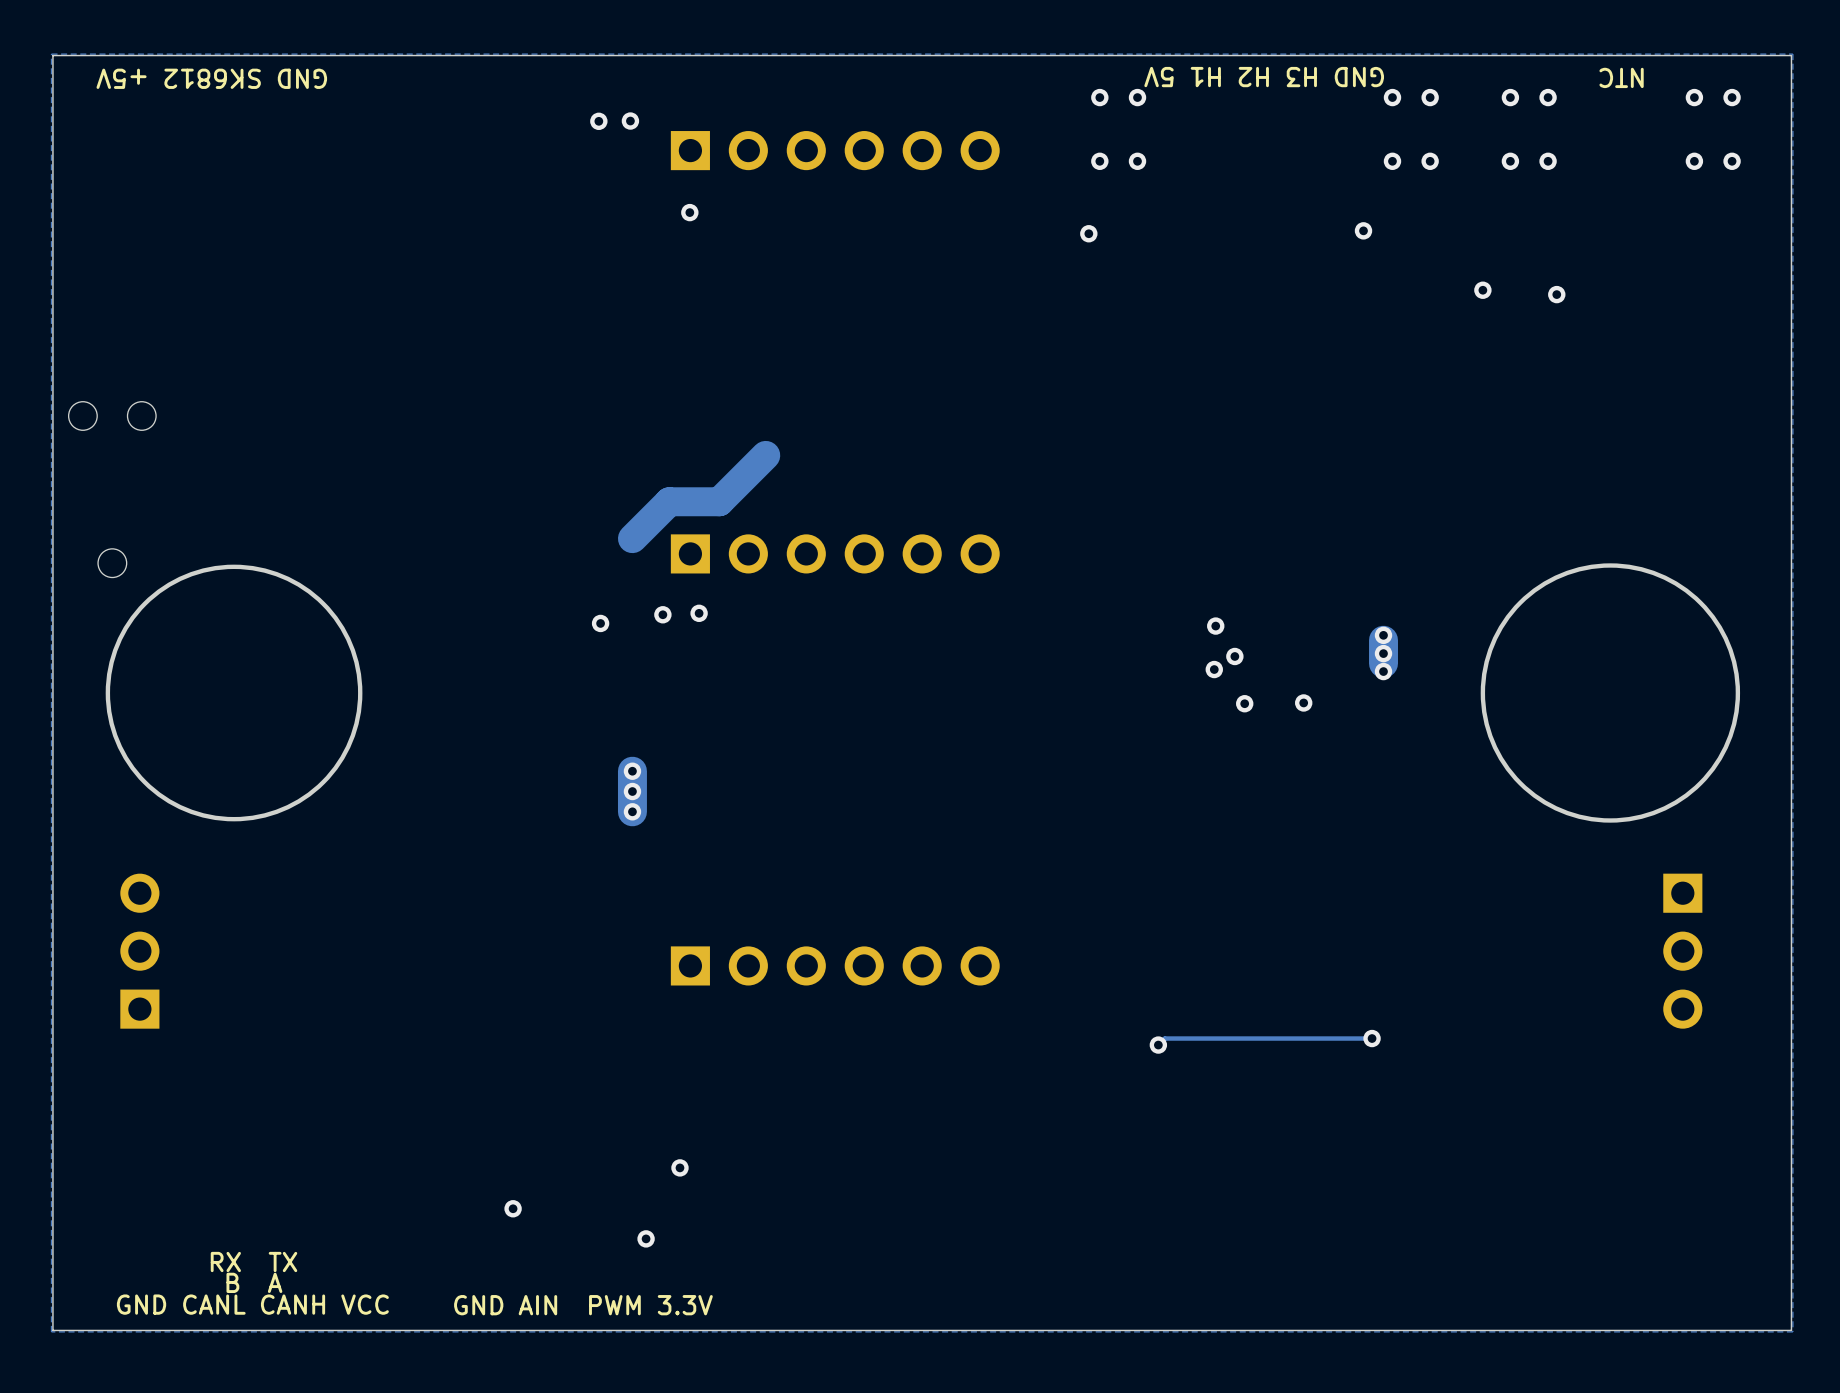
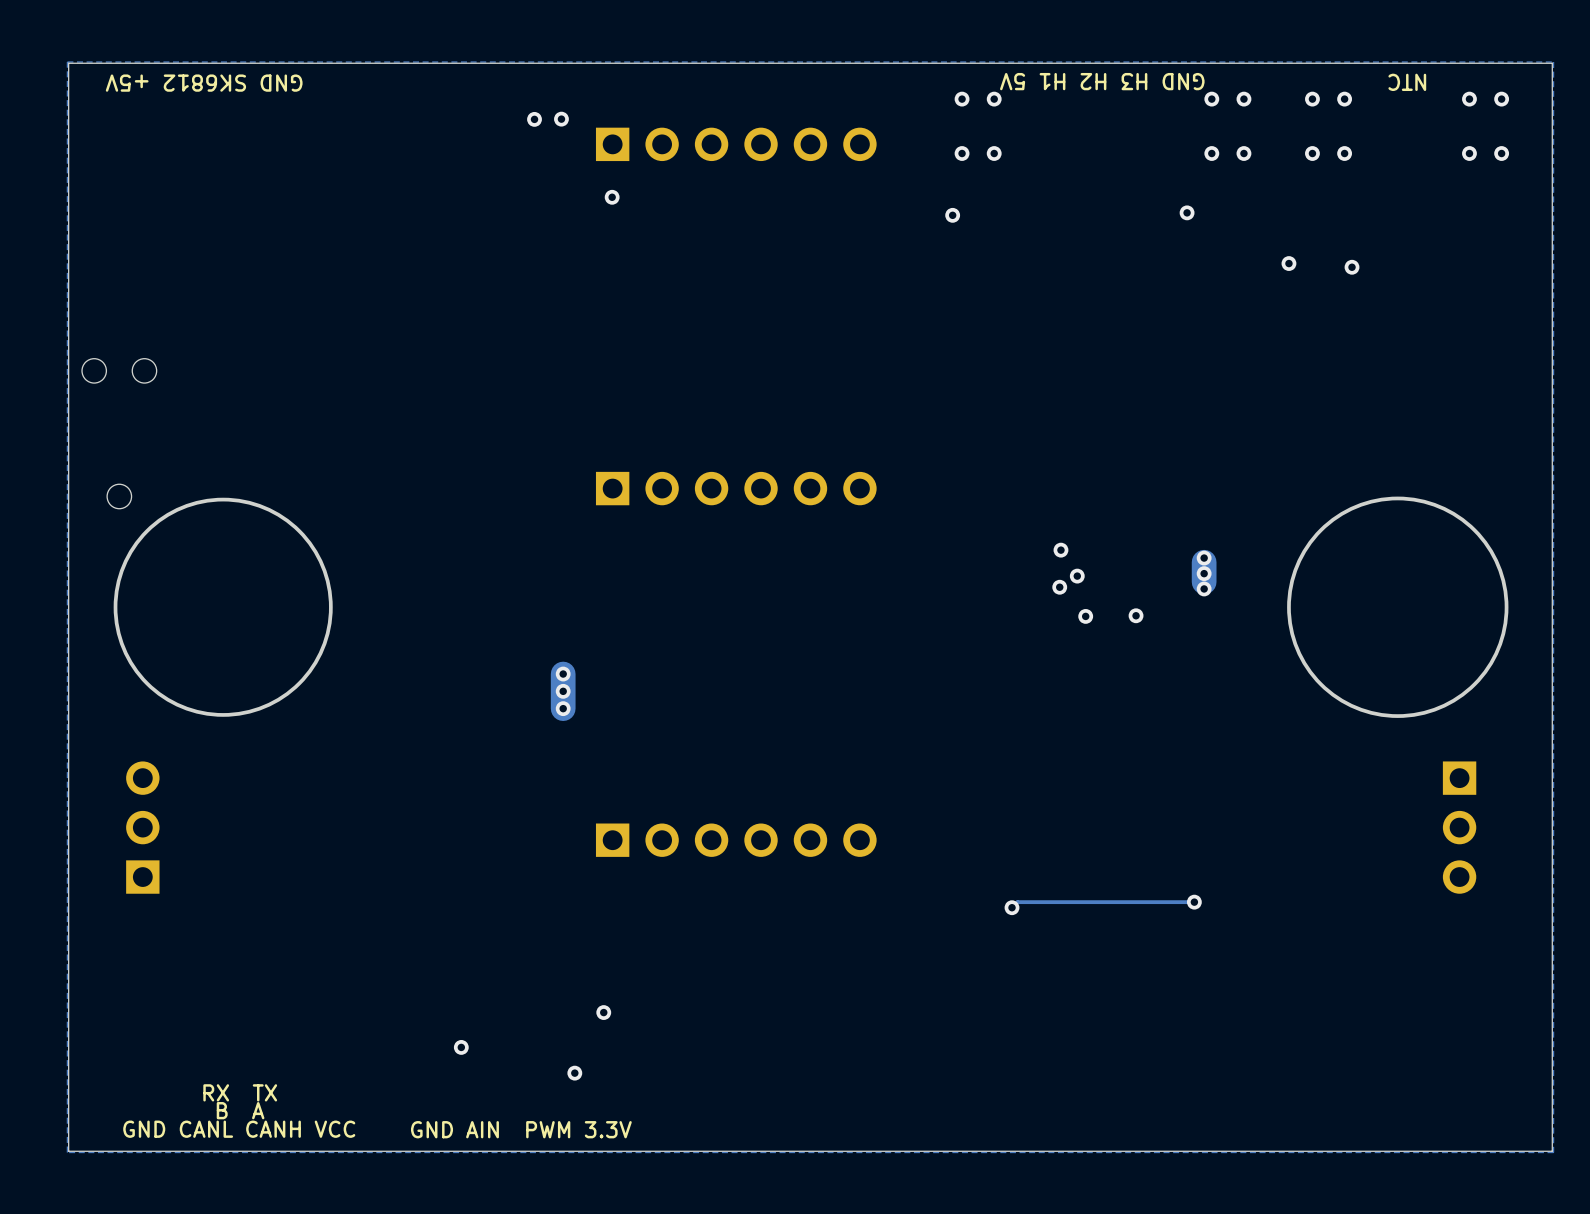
track: (765, 455) (719, 501) (669, 501) (632, 538) -> none
via: (699, 613) -> none
via: (662, 614) -> none
via: (600, 623) -> none

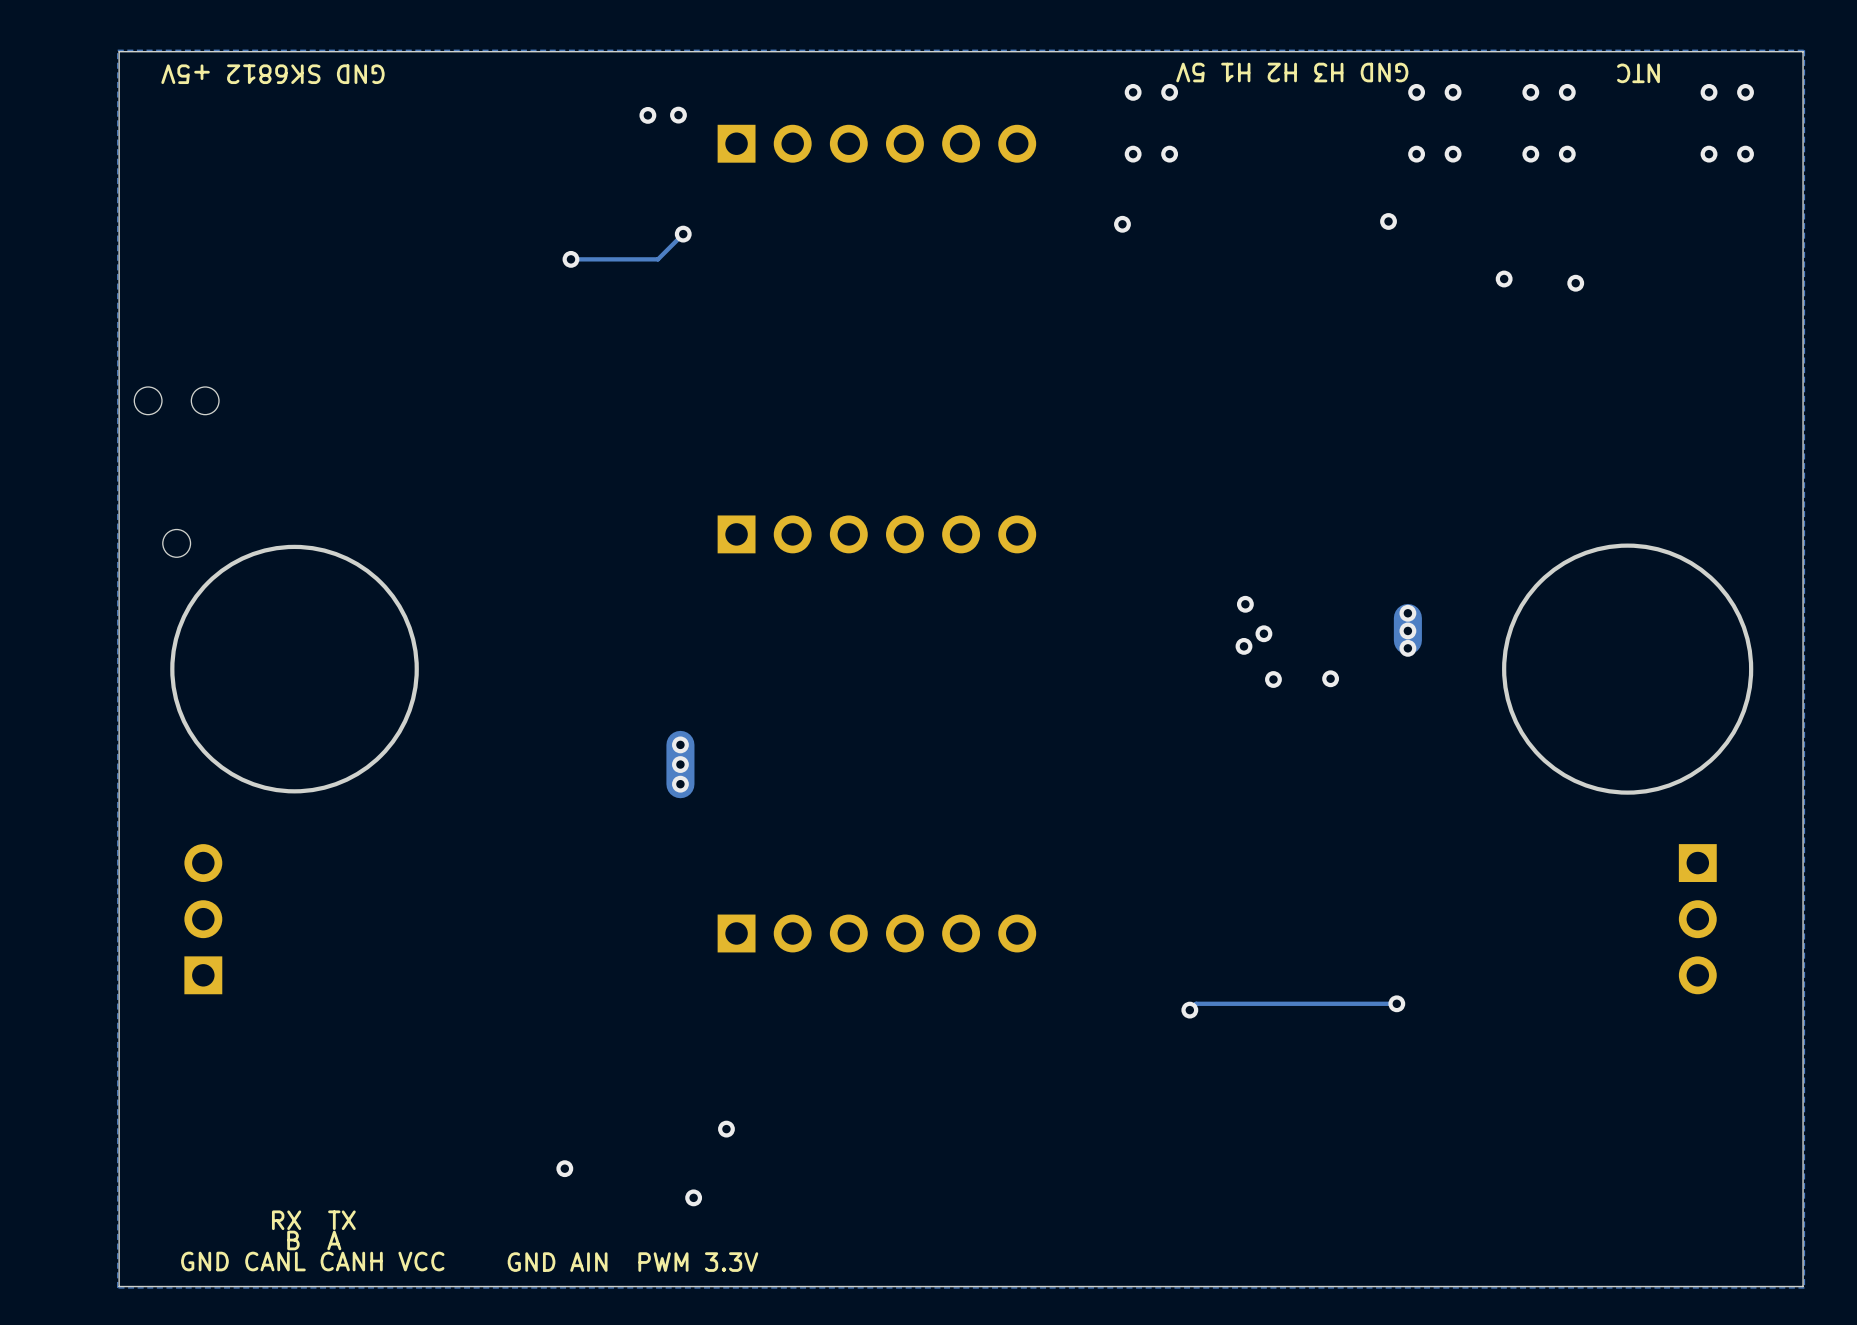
via position: (612, 197) -> (683, 234)
track: none -> (683, 234) (657, 259) (573, 259)
via: none -> (570, 259)

